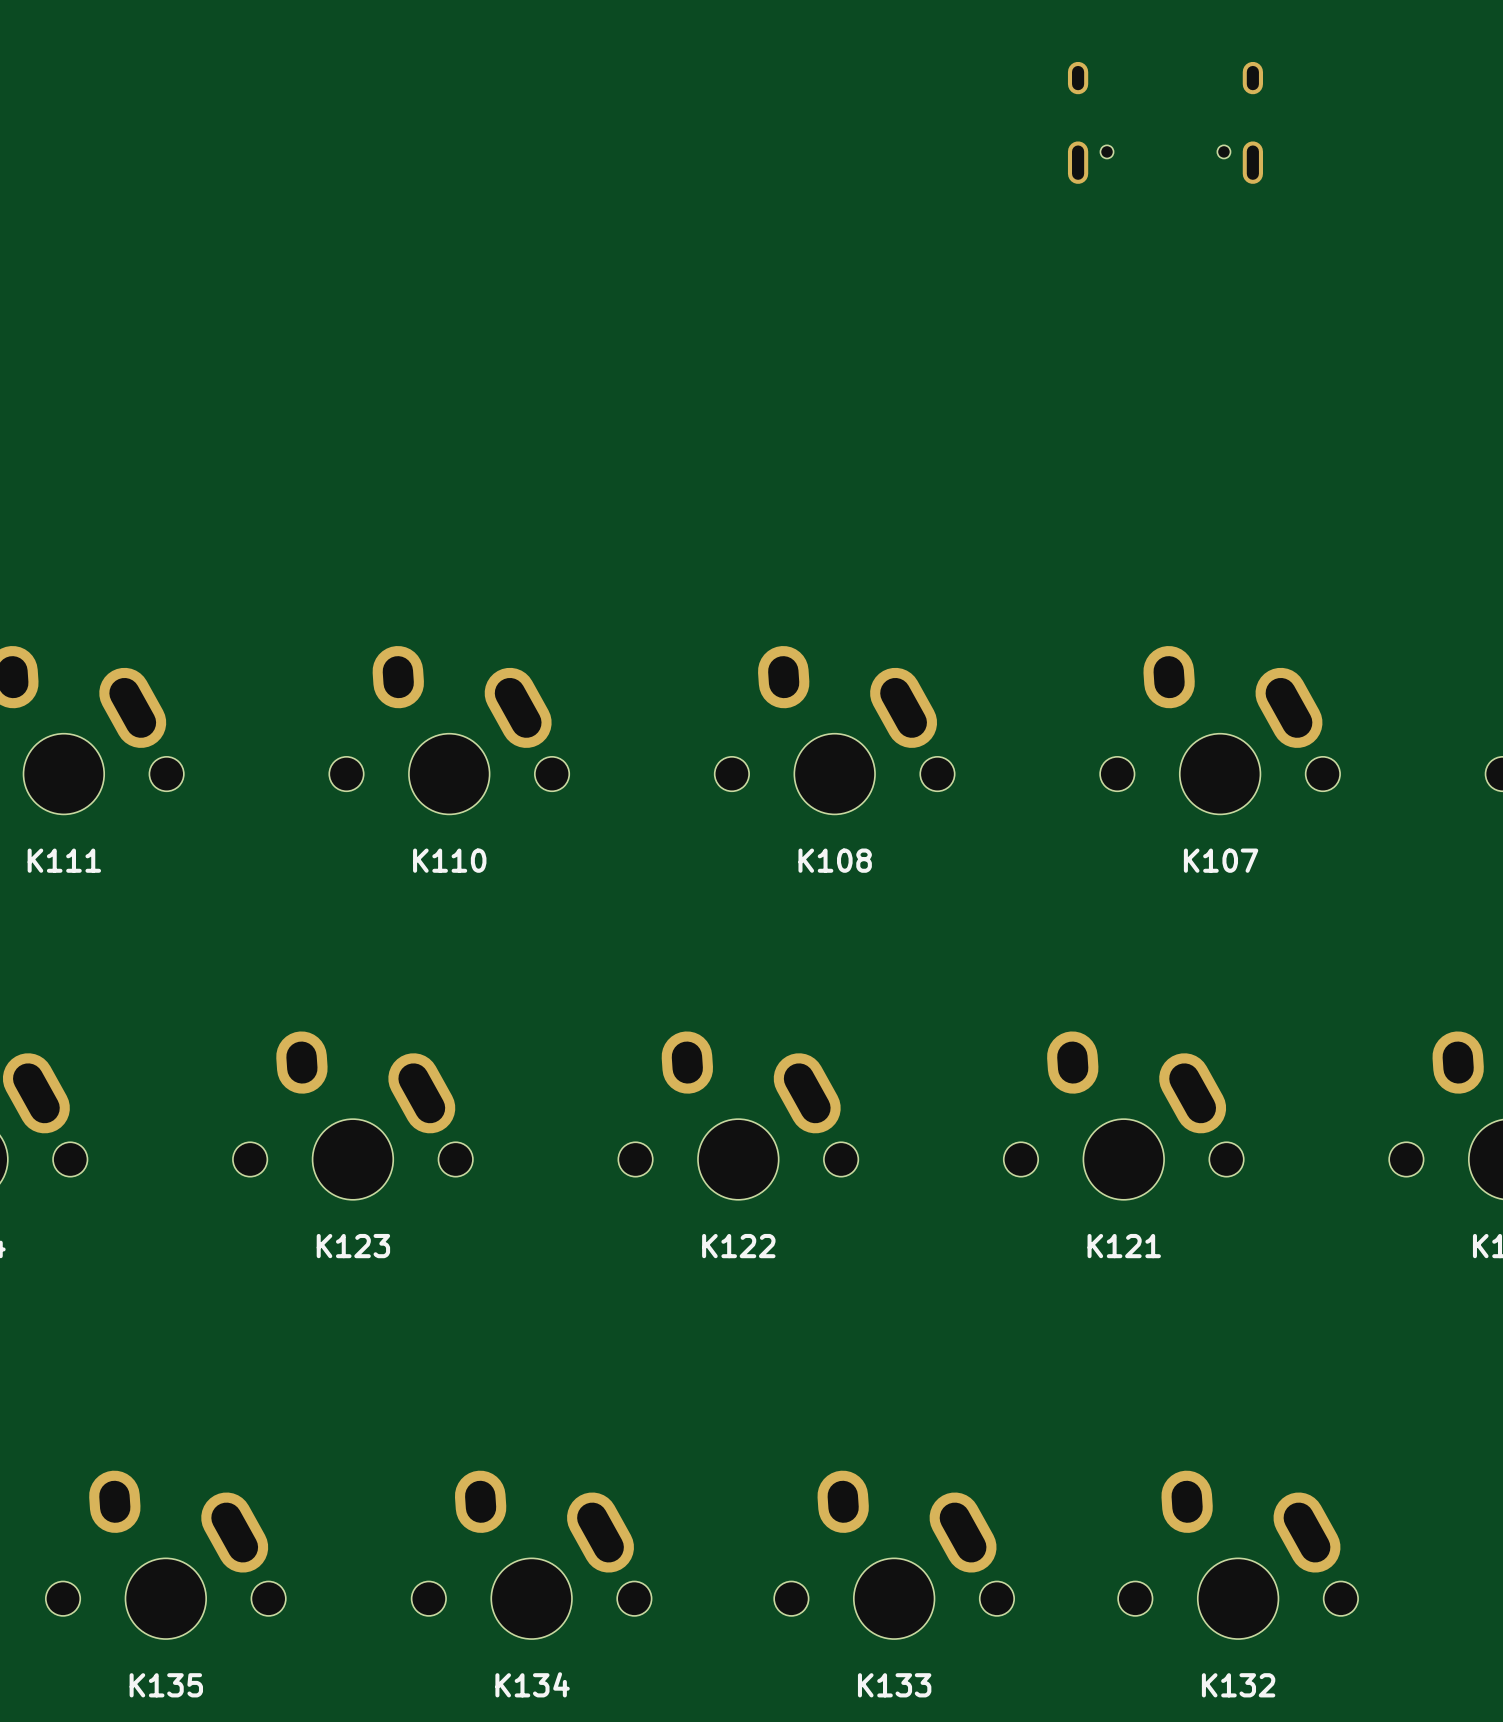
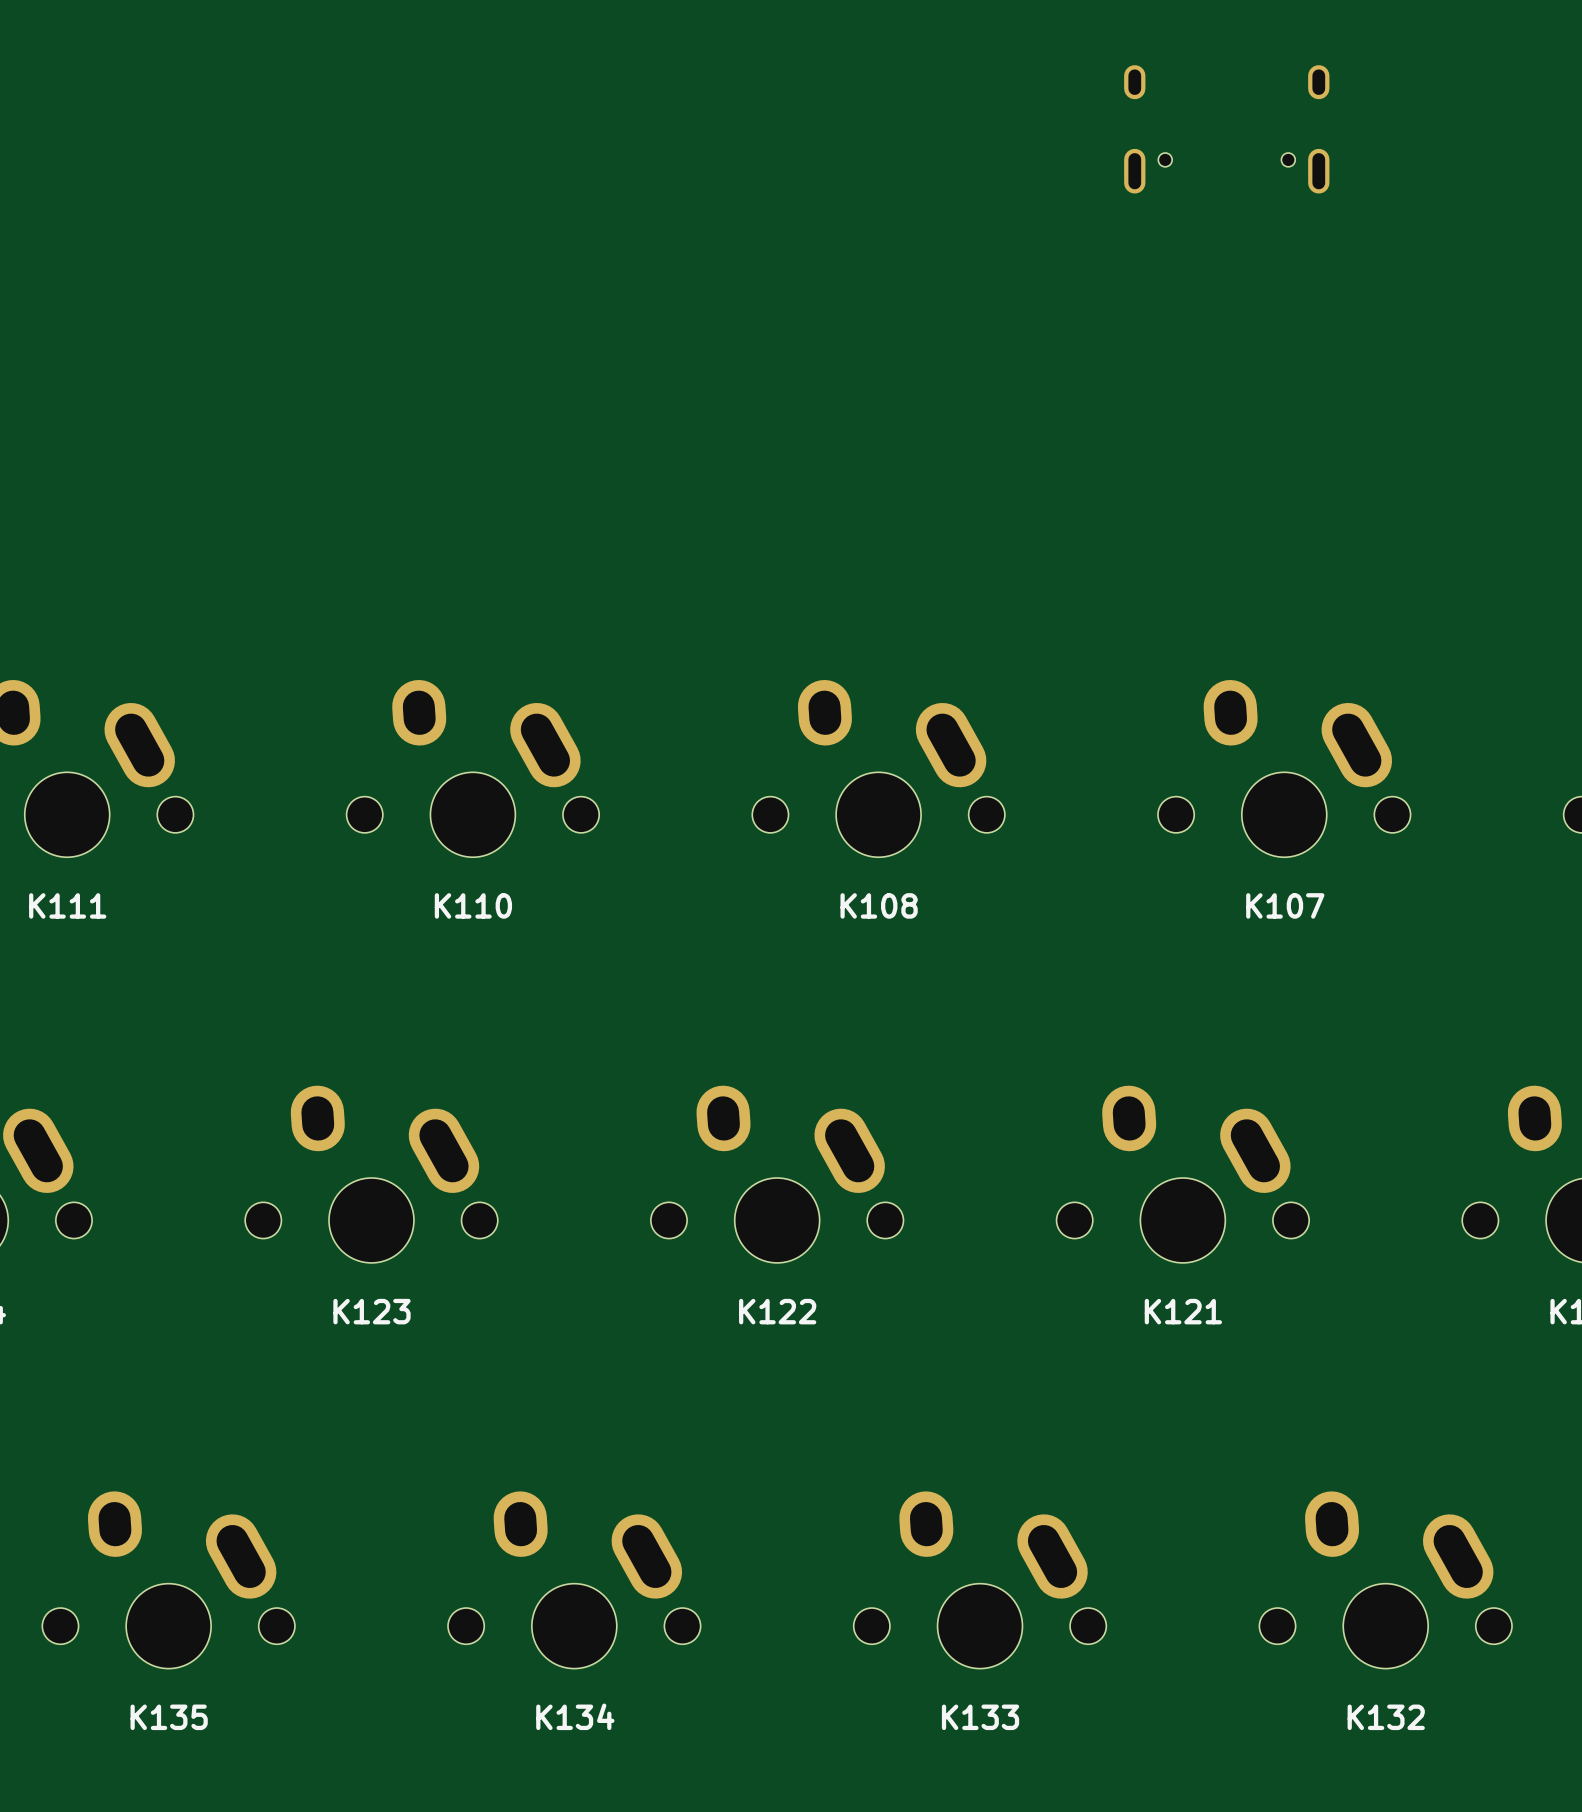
K135 position: (165, 1554) -> (168, 1579)
K134 position: (531, 1554) -> (574, 1579)
K133 position: (894, 1554) -> (980, 1579)
K132 position: (1238, 1554) -> (1385, 1579)

